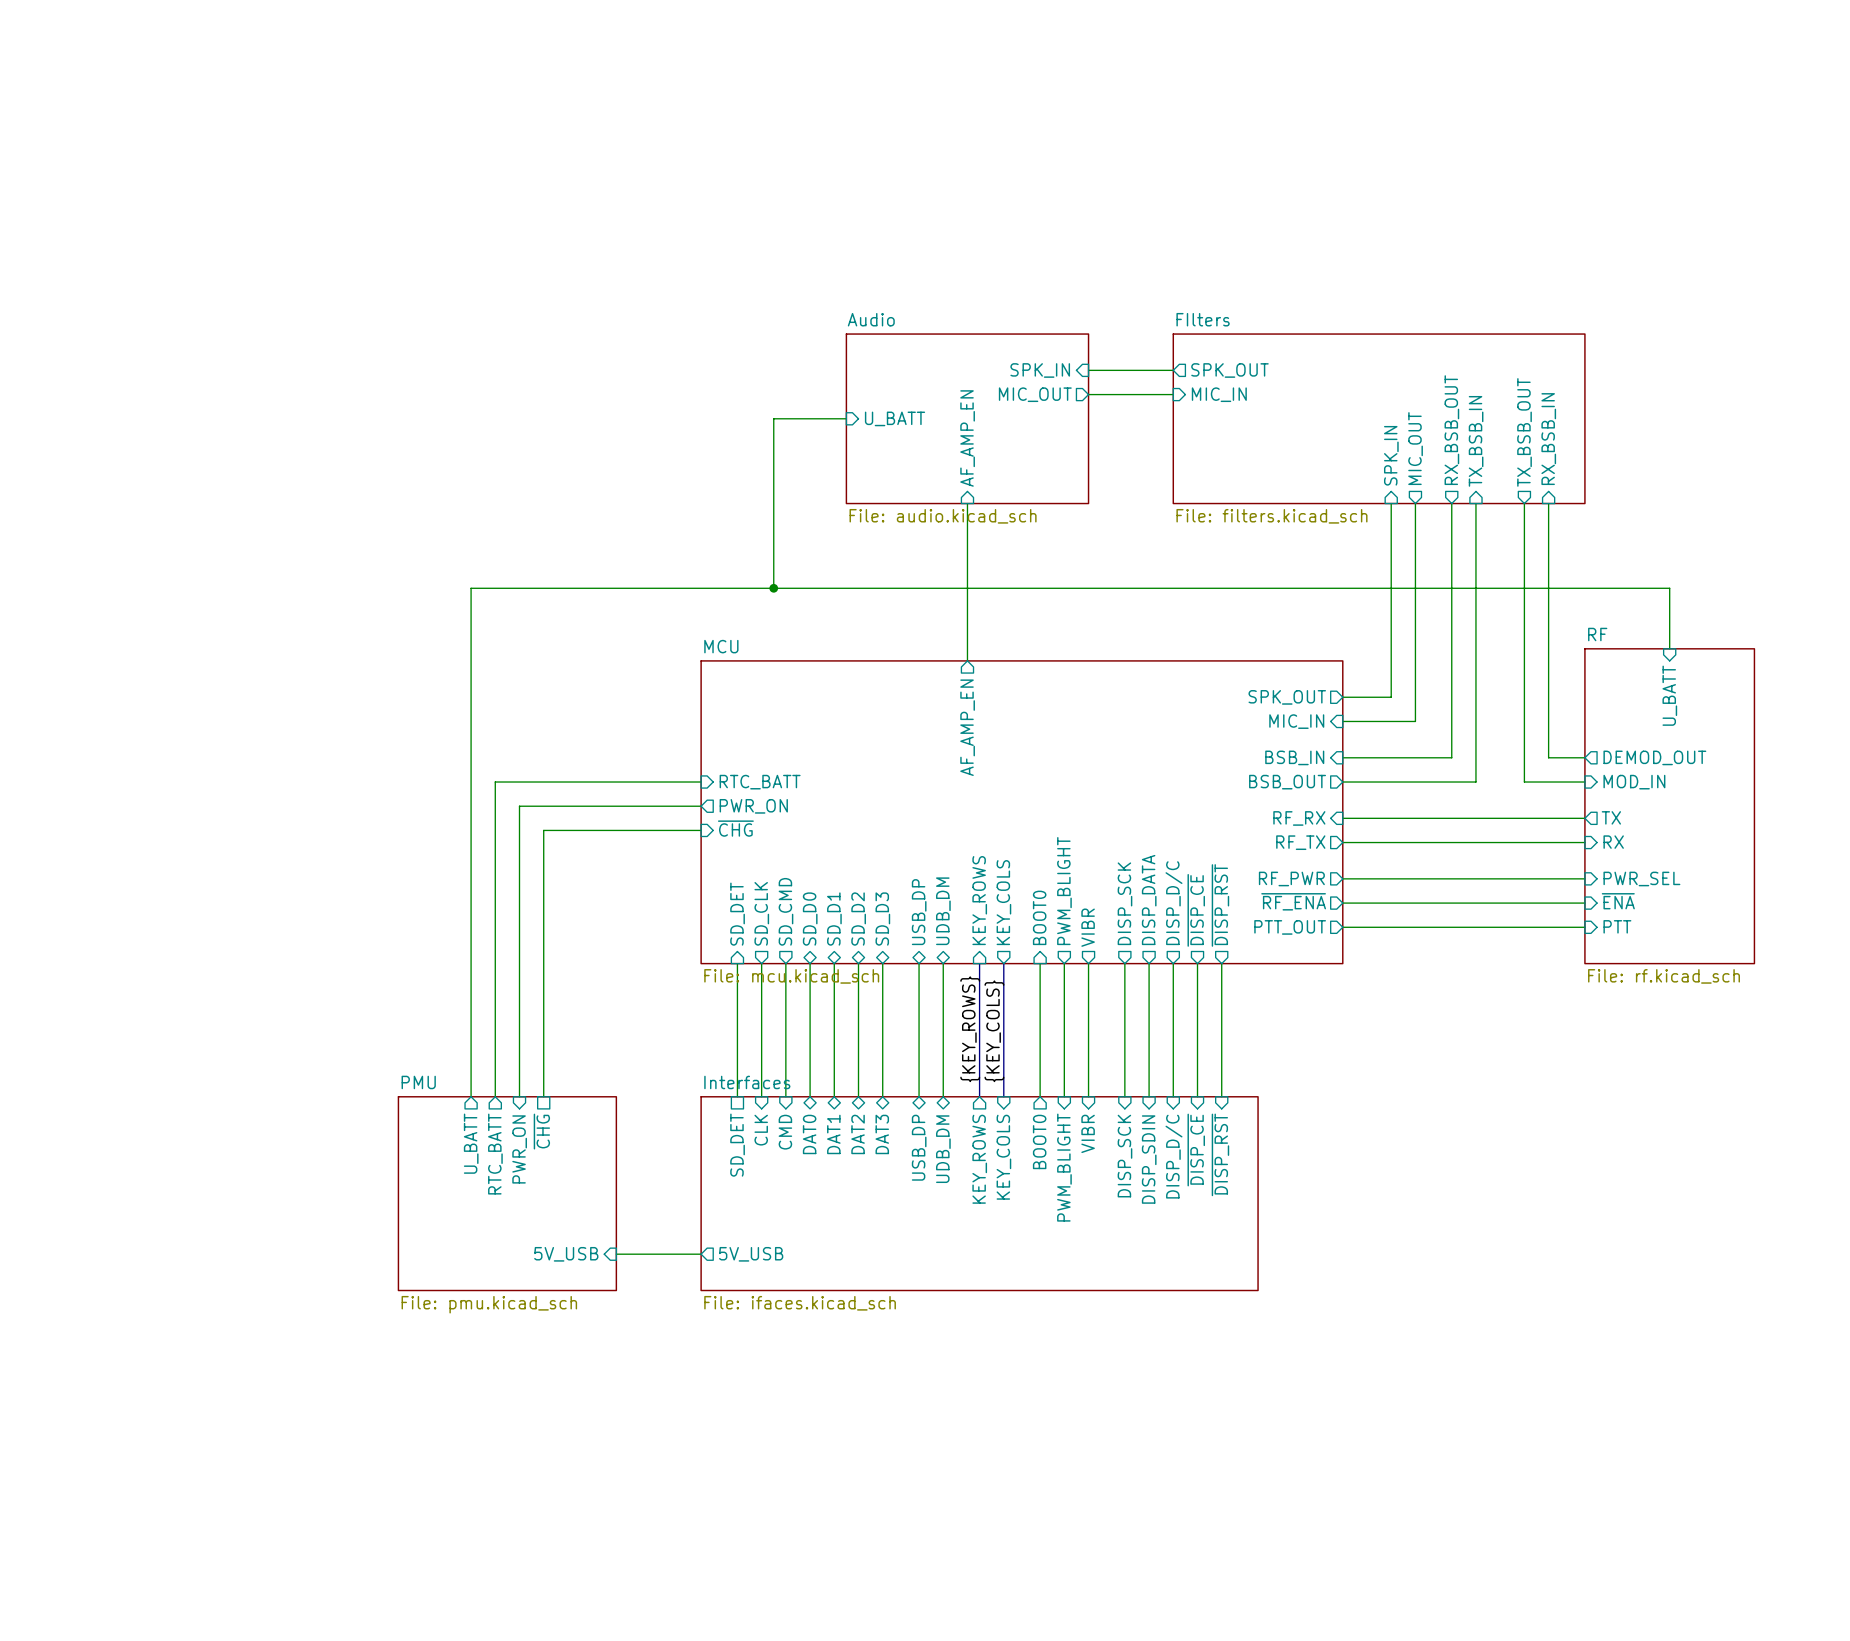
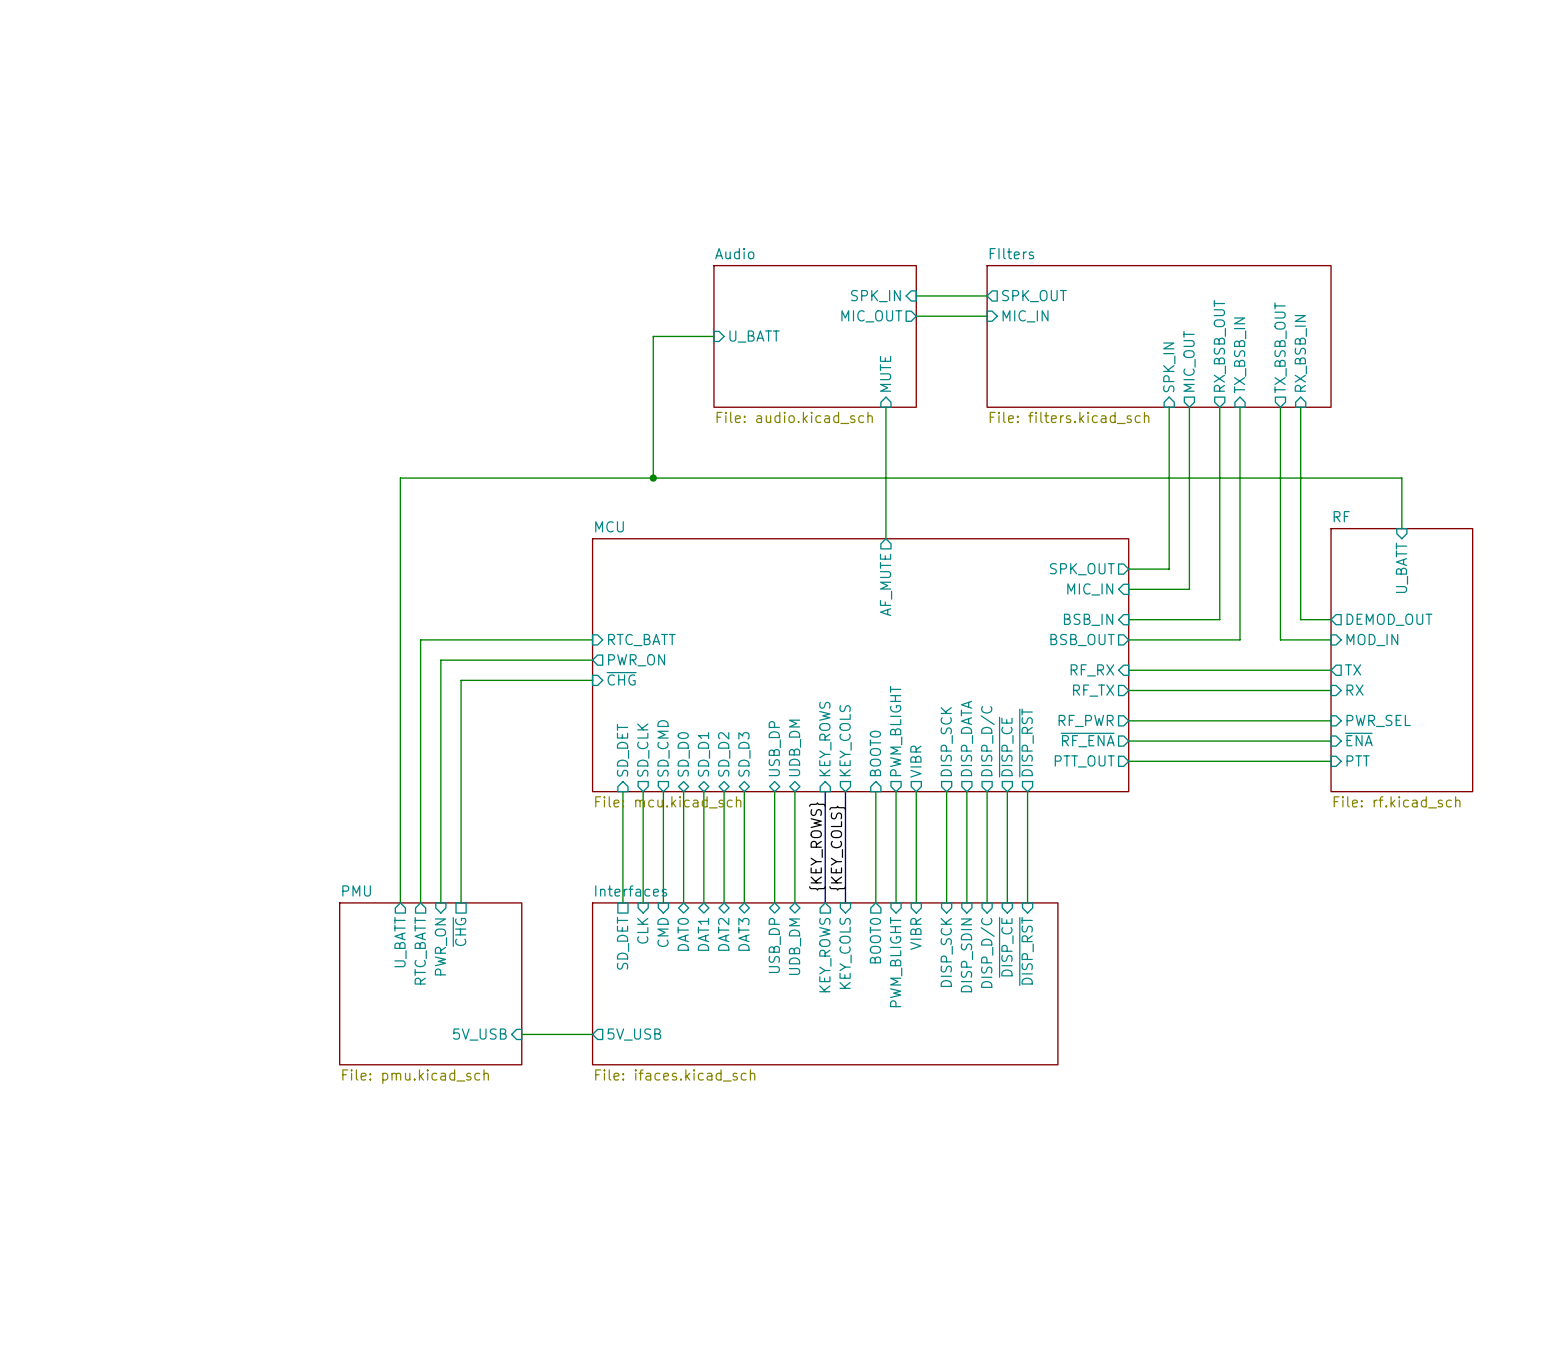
sheet pin: AF_AMP_EN (967, 438) -> none
sheet pin: none -> MUTE (885, 373)
wire: (967, 503) (967, 660) -> (885, 407) (885, 538)
sheet pin: none -> AF_MUTE (886, 584)
sheet pin: AF_AMP_EN (967, 727) -> none

